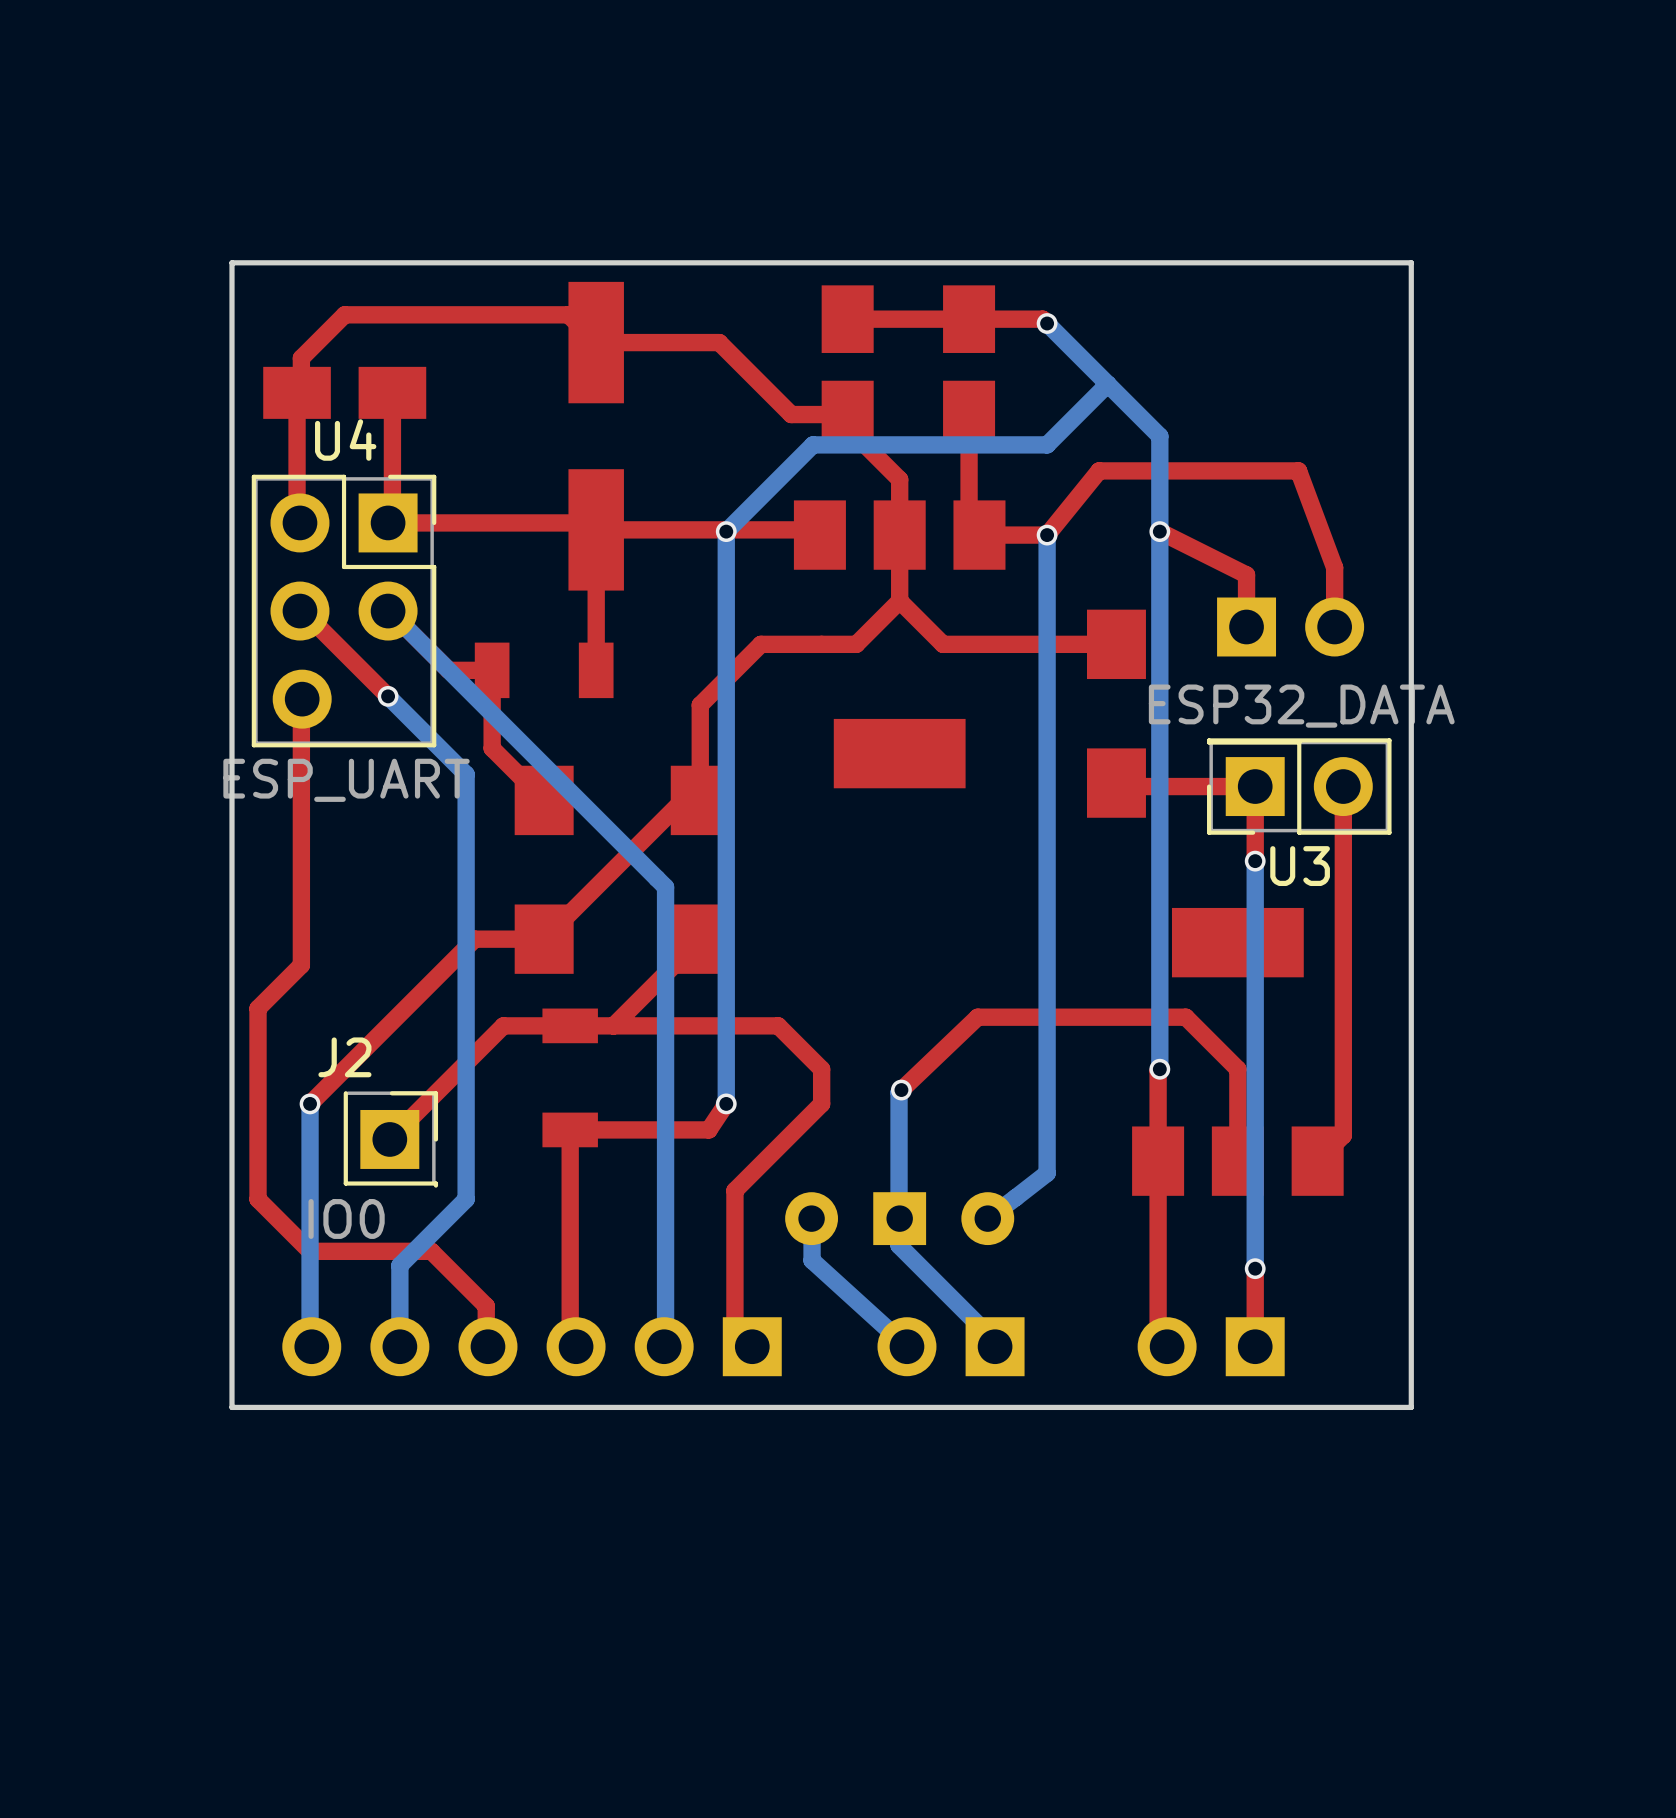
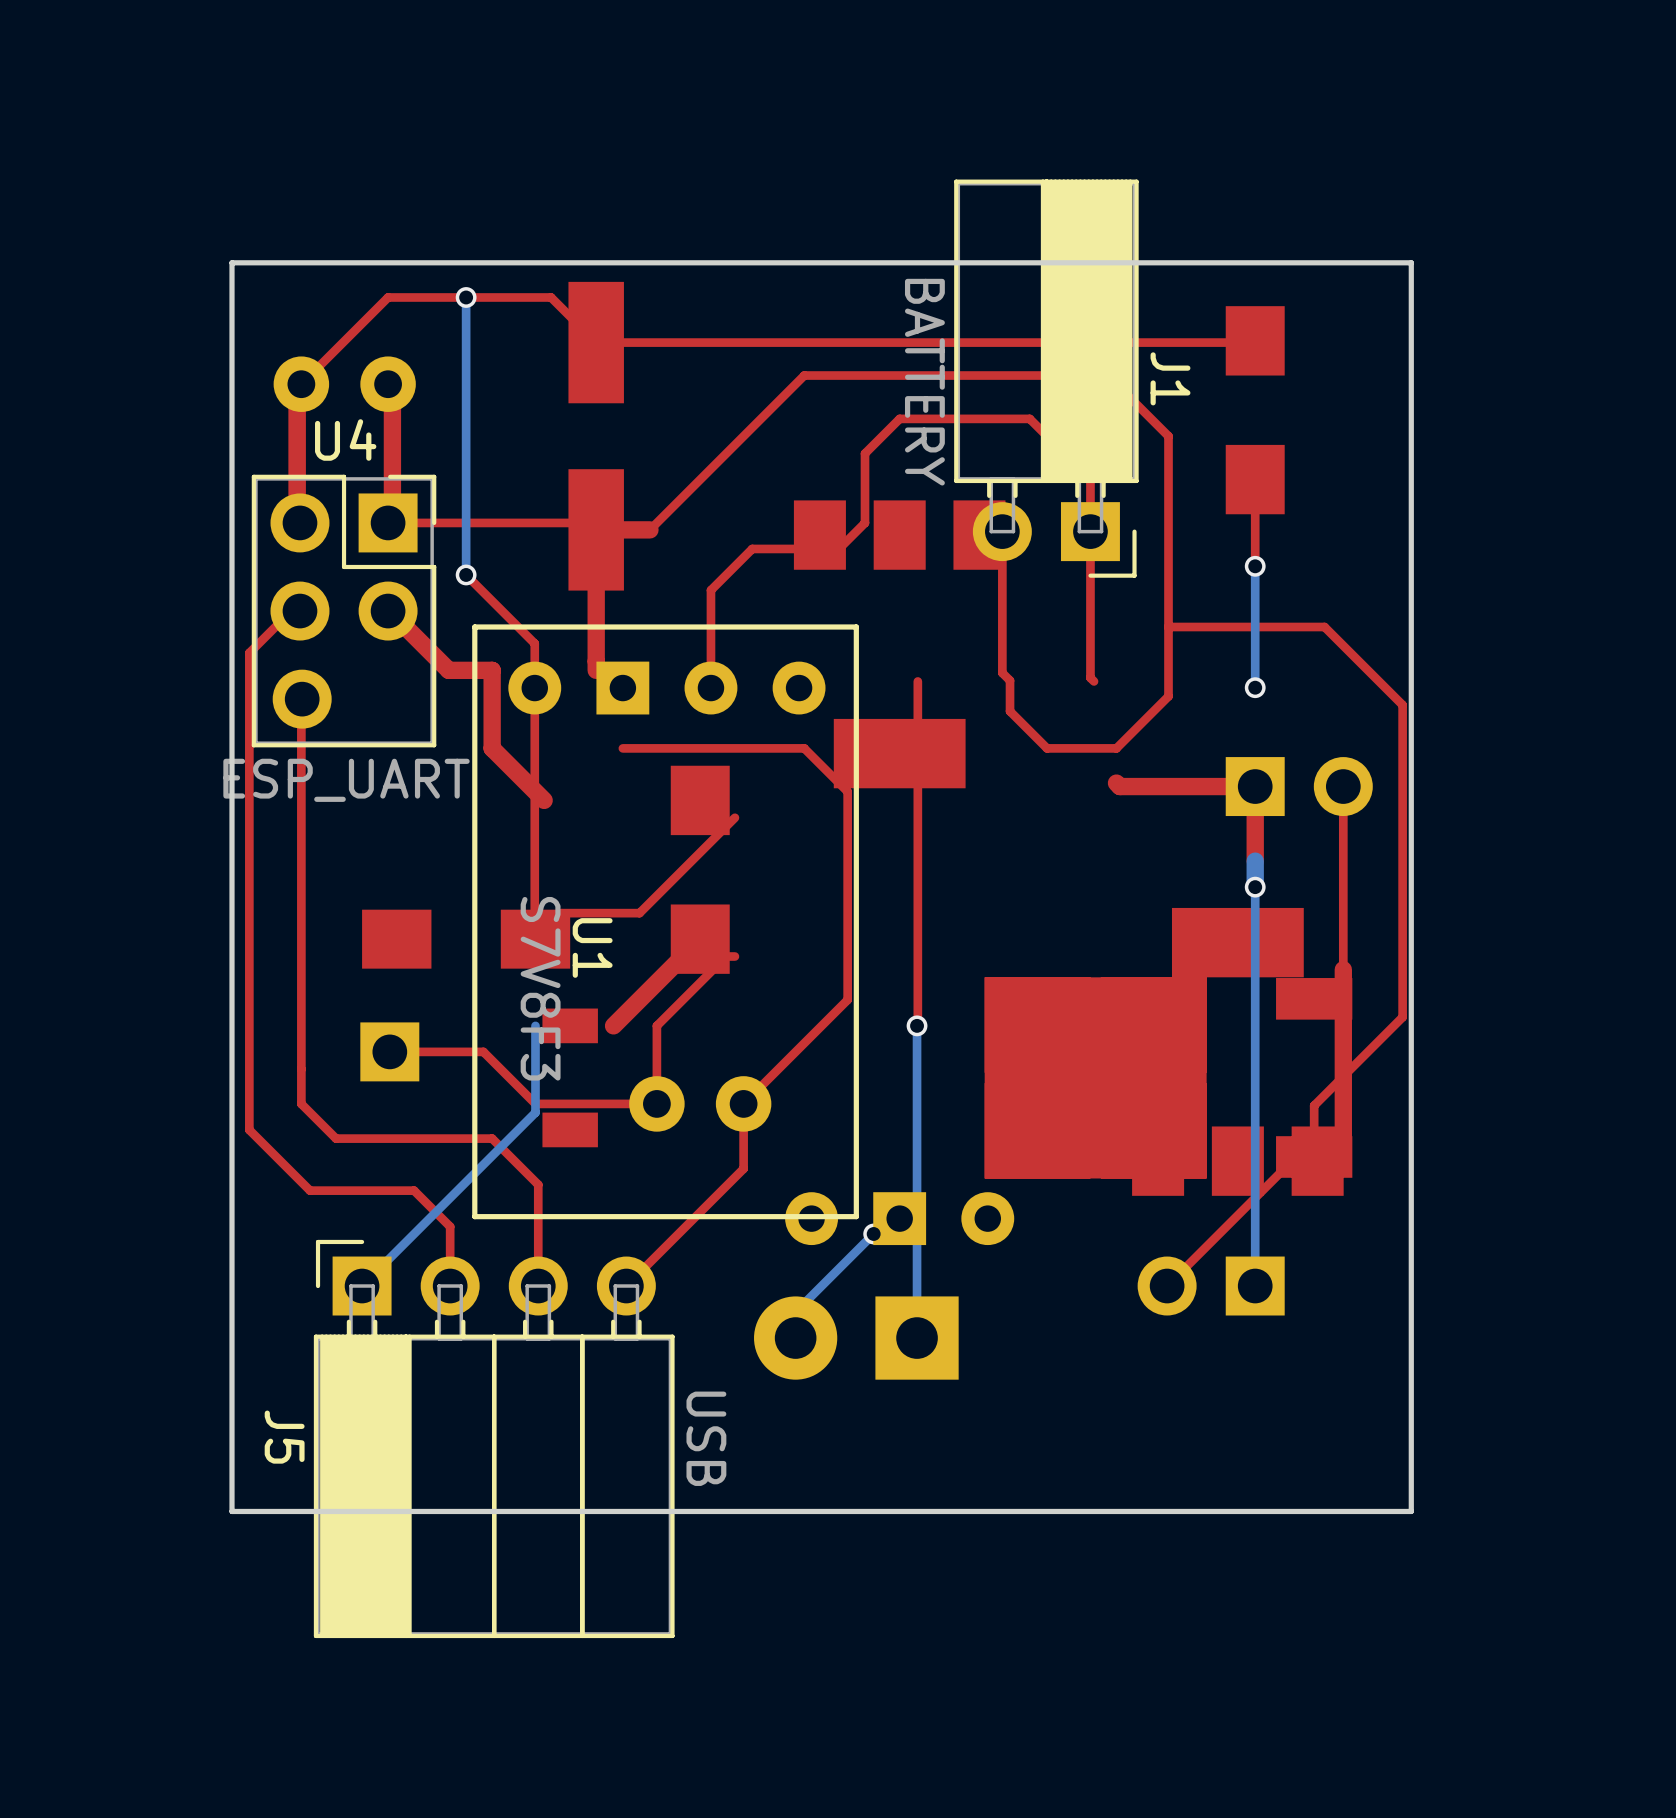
bottom track: none -> (466, 297) (466, 574)
via: none -> (466, 297)
top track: (568, 314) (344, 314) (301, 358) (301, 384) -> (568, 314) (551, 297) (388, 297) (301, 384) (301, 522)
top track width: thick (568, 314) (596, 342) (719, 342) -> thin (568, 314) (596, 342) (719, 342)
top track: (847, 319) (1042, 319) (1047, 323) -> none
bottom track: (1047, 323) (1159, 436) (1159, 1069) -> none
via: (1047, 323) -> none
top track: (719, 342) (791, 414) (847, 414) (847, 427) (899, 479) (899, 600) -> (719, 342) (1253, 342) (1255, 340)
part footprint: [263, 366, 427, 419] -> [273, 356, 416, 412]
part: (847, 366) -> none
part: (969, 366) -> none
bottom track: (1107, 384) (1047, 444) (812, 444) (726, 531) (726, 1103) -> none
top track: (969, 414) (969, 524) (979, 535) (1047, 535) (1099, 470) (1298, 470) (1334, 567) (1334, 627) -> none
top track: none -> (1255, 479) (1255, 566)
top track width: thick (389, 522) (589, 522) (596, 529) -> thin (389, 522) (589, 522) (596, 529)
top track: (649, 529) (814, 529) (819, 535) -> (649, 529) (804, 375) (1107, 375) (1168, 436) (1168, 696) (1116, 748) (1047, 748) (1010, 711) (1010, 680) (1002, 672) (1002, 531)
via: (726, 531) -> none
top track: (1159, 531) (1246, 574) (1246, 627) -> none
via: (1159, 531) -> none
bottom track: (1047, 535) (1047, 1173) (988, 1218) -> none
via: (1047, 535) -> none
bottom track: none -> (1255, 566) (1255, 687)
via: none -> (1255, 566)
top track: none -> (466, 574) (534, 643) (535, 939) (561, 913) (639, 913) (734, 817)
via: none -> (466, 574)
top track: (899, 600) (856, 644) (760, 644) (700, 705) (700, 800) (682, 800) (544, 939) (474, 939) (310, 1103) -> none
top track: (899, 600) (943, 644) (1116, 644) -> none
top track: (301, 611) (388, 696) -> (301, 611) (291, 611) (249, 653) (249, 1129) (310, 1190) (414, 1190) (450, 1226) (450, 1286)
bottom track: (389, 611) (665, 887) (665, 1343) (662, 1346) -> none
top track: none -> (1168, 627) (1324, 627) (1402, 705) (1402, 1017) (1314, 1105) (1314, 1156) (1296, 1156) (1167, 1286)
J1 side: top (1290, 627) -> bottom (1046, 378)
part: (544, 670) -> none
top track: none -> (917, 681) (917, 1025)
top track: none -> (1094, 681) (1090, 677) (1090, 479) (1029, 418) (899, 418) (865, 453) (865, 522) (838, 548) (752, 548) (710, 590) (710, 688)
via: none -> (1255, 687)
bottom track: (388, 696) (466, 774) (466, 1199) (399, 1265) (399, 1346) -> none
via: (388, 696) -> none
top track width: thick (301, 699) (301, 965) -> thin (301, 699) (301, 965)
part position: (1116, 713) -> (1255, 410)
top track: none -> (622, 748) (804, 748) (847, 791) (847, 999) (743, 1103) (743, 1168) (626, 1286)
U3 side: bottom (1299, 786) -> top (1299, 786)
top track width: thick (1343, 786) (1343, 969) -> thin (1343, 786) (1343, 969)
via position: (1255, 861) -> (1255, 887)
part rotation: 0° (544, 869) -> 90° clockwise (466, 939)
bottom track width: thick (1255, 887) (1255, 1268) -> thin (1255, 887) (1255, 1268)
U1: none -> S7V8F3 (665, 921)
top track: none -> (734, 956) (726, 956) (656, 1025) (656, 1103) (535, 1103) (483, 1051) (389, 1051)
top track: (301, 965) (258, 1008) (258, 1199) (310, 1251) (431, 1251) (486, 1306) (486, 1346) -> (301, 965) (301, 1103) (336, 1138) (492, 1138) (538, 1184) (538, 1286)
bottom track: none -> (535, 1025) (535, 1112) (362, 1286)
bottom track: none -> (917, 1025) (917, 1338)
top track: (1159, 1069) (1158, 1070) (1158, 1337) (1167, 1346) -> none
via: (1159, 1069) -> none
part: none -> (1168, 1077)
top track: (901, 1090) (977, 1017) (1185, 1017) (1237, 1069) (1237, 1161) -> none
bottom track: (901, 1090) (899, 1092) (899, 1245) (988, 1334) (995, 1346) -> none
via position: (901, 1090) -> (917, 1025)
bottom track: (310, 1103) (310, 1346) -> none
via: (310, 1103) -> none
part: none -> (700, 1103)
top track: (726, 1103) (708, 1129) (570, 1129) (570, 1342) (574, 1346) -> none
via: (726, 1103) -> none
top track: (389, 1139) (503, 1025) (778, 1025) (821, 1069) (821, 1103) (734, 1190) (734, 1329) (752, 1346) -> none
J2 side: bottom (390, 1139) -> top (389, 1051)
bottom track: (812, 1221) (812, 1260) (906, 1346) -> none
bottom track: none -> (873, 1233) (795, 1312) (795, 1338)
via: none -> (873, 1233)
top track: (1255, 1268) (1255, 1346) -> none
via: (1255, 1268) -> none
part: none -> (856, 1338)
part: (532, 1346) -> none
part: (951, 1346) -> none
part position: (1211, 1346) -> (1211, 1286)
board edge: (1411, 1407) (232, 1407) -> (1411, 1407) (1411, 1511) (232, 1511) (232, 1407)
J5: none -> USB (494, 1438)

